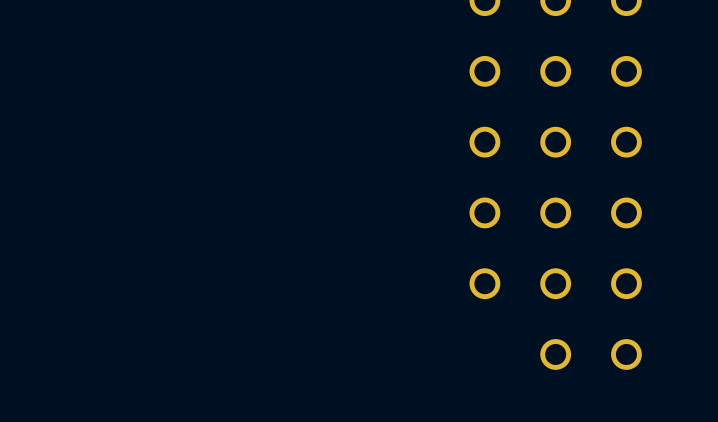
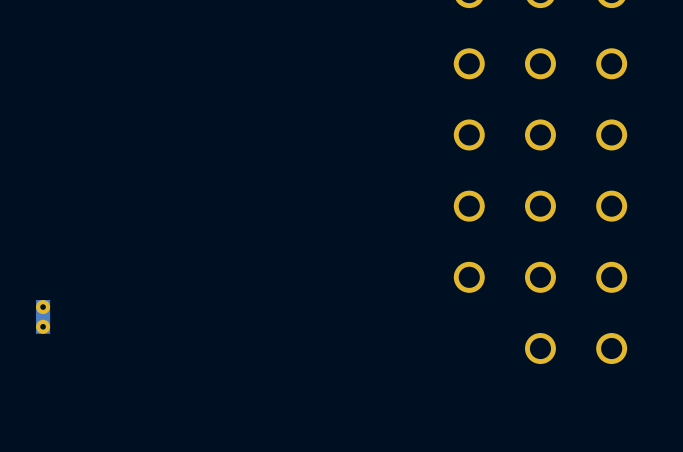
part: none -> (43, 316)

